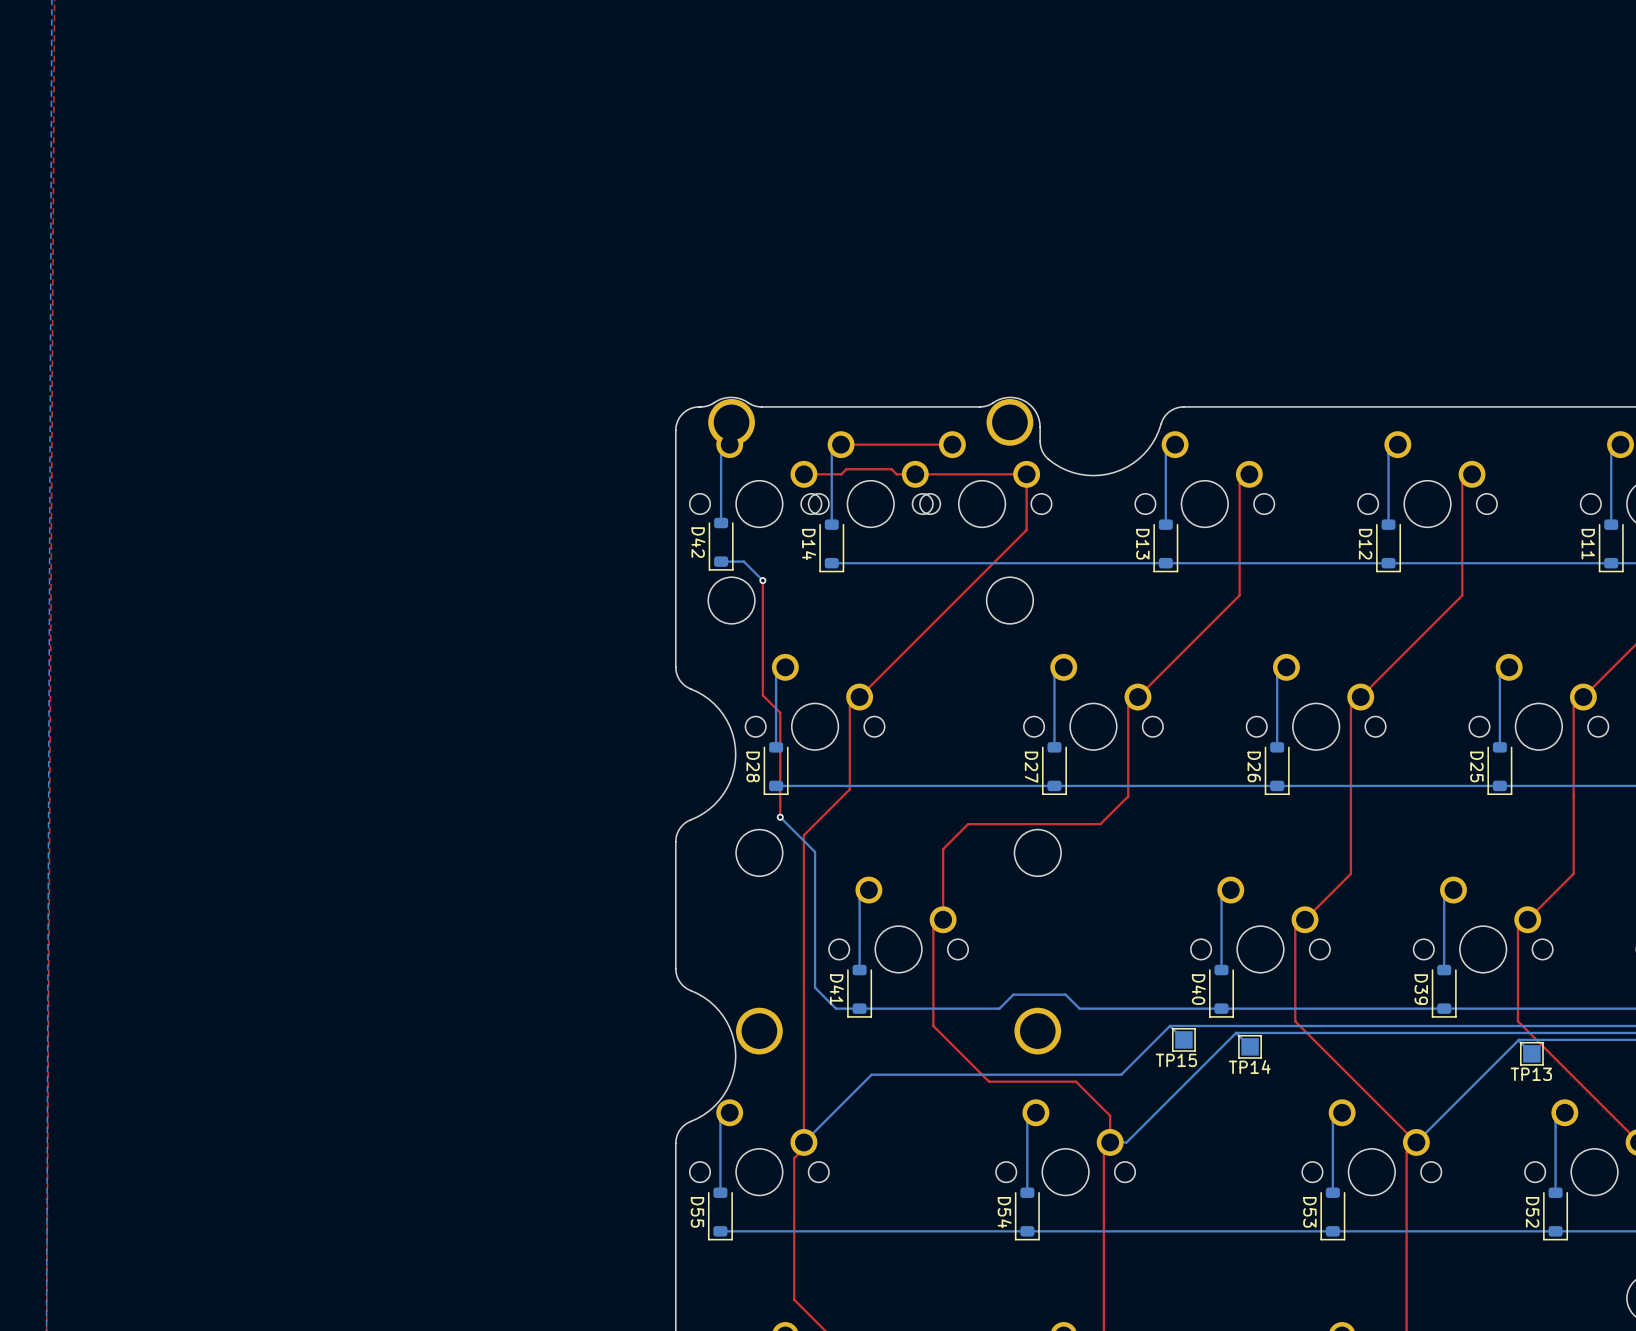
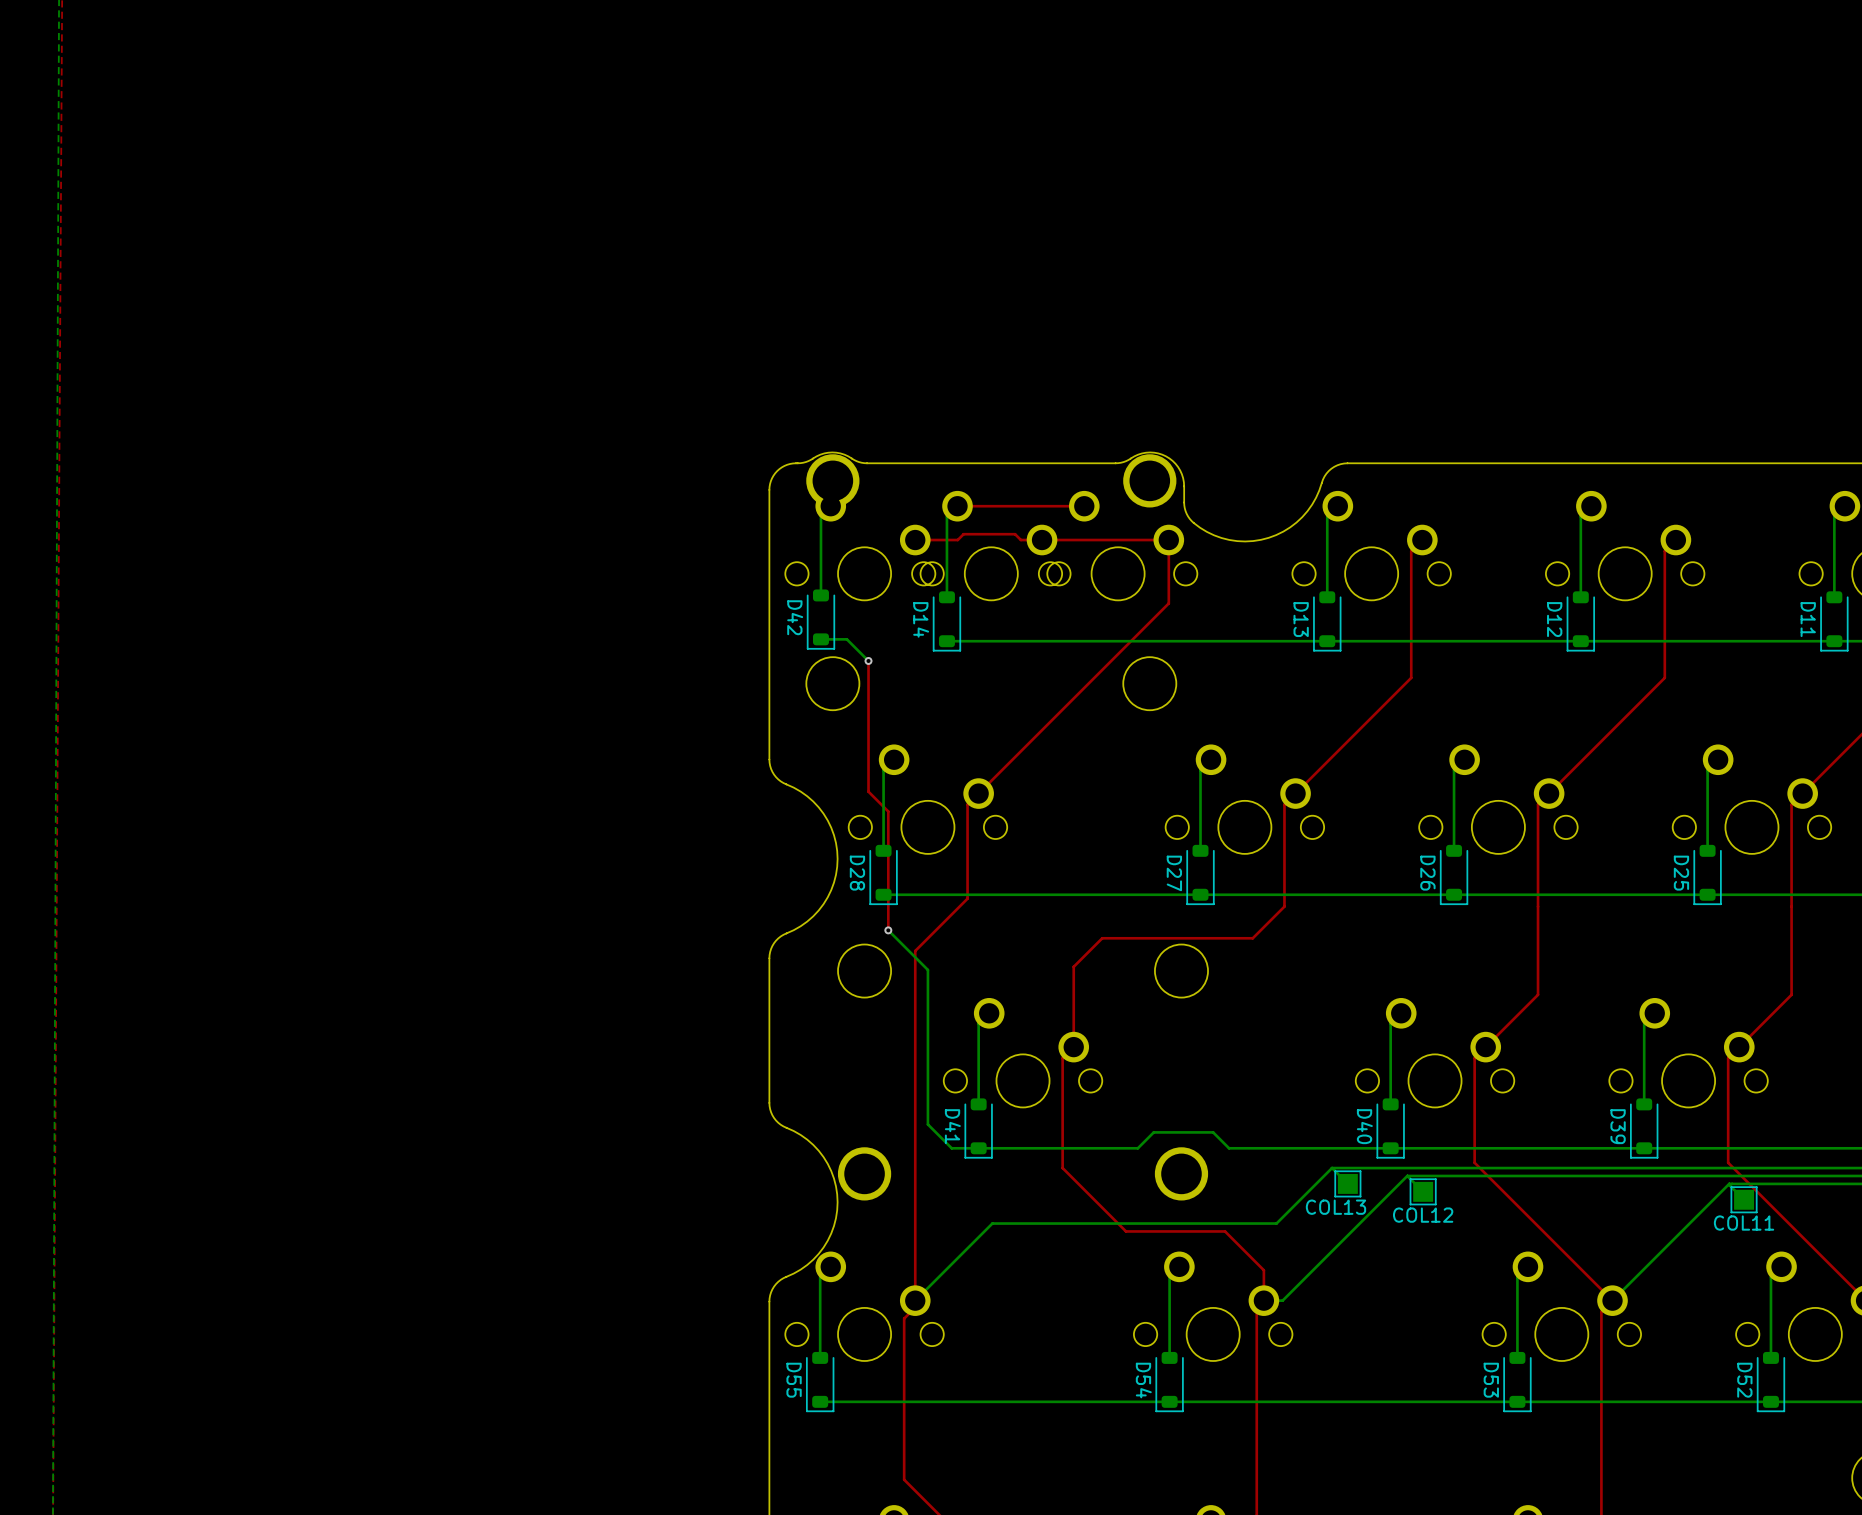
TP15 name: TP15 (1176, 1060) -> COL13 (1335, 1207)
TP14 name: TP14 (1249, 1067) -> COL12 (1423, 1215)
TP13 name: TP13 (1531, 1074) -> COL11 (1744, 1223)

